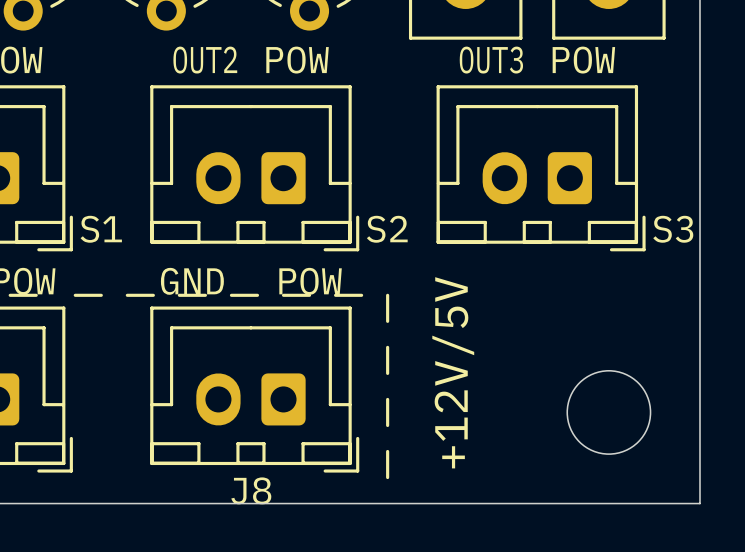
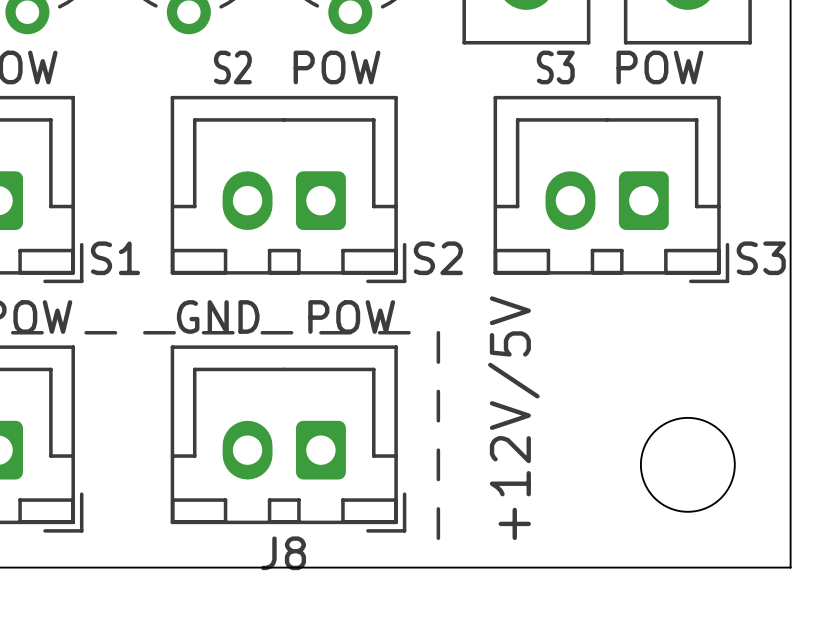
text: OUT2 (205, 60) -> S2 (232, 67)
text: OUT3 (491, 60) -> S3 (555, 67)

